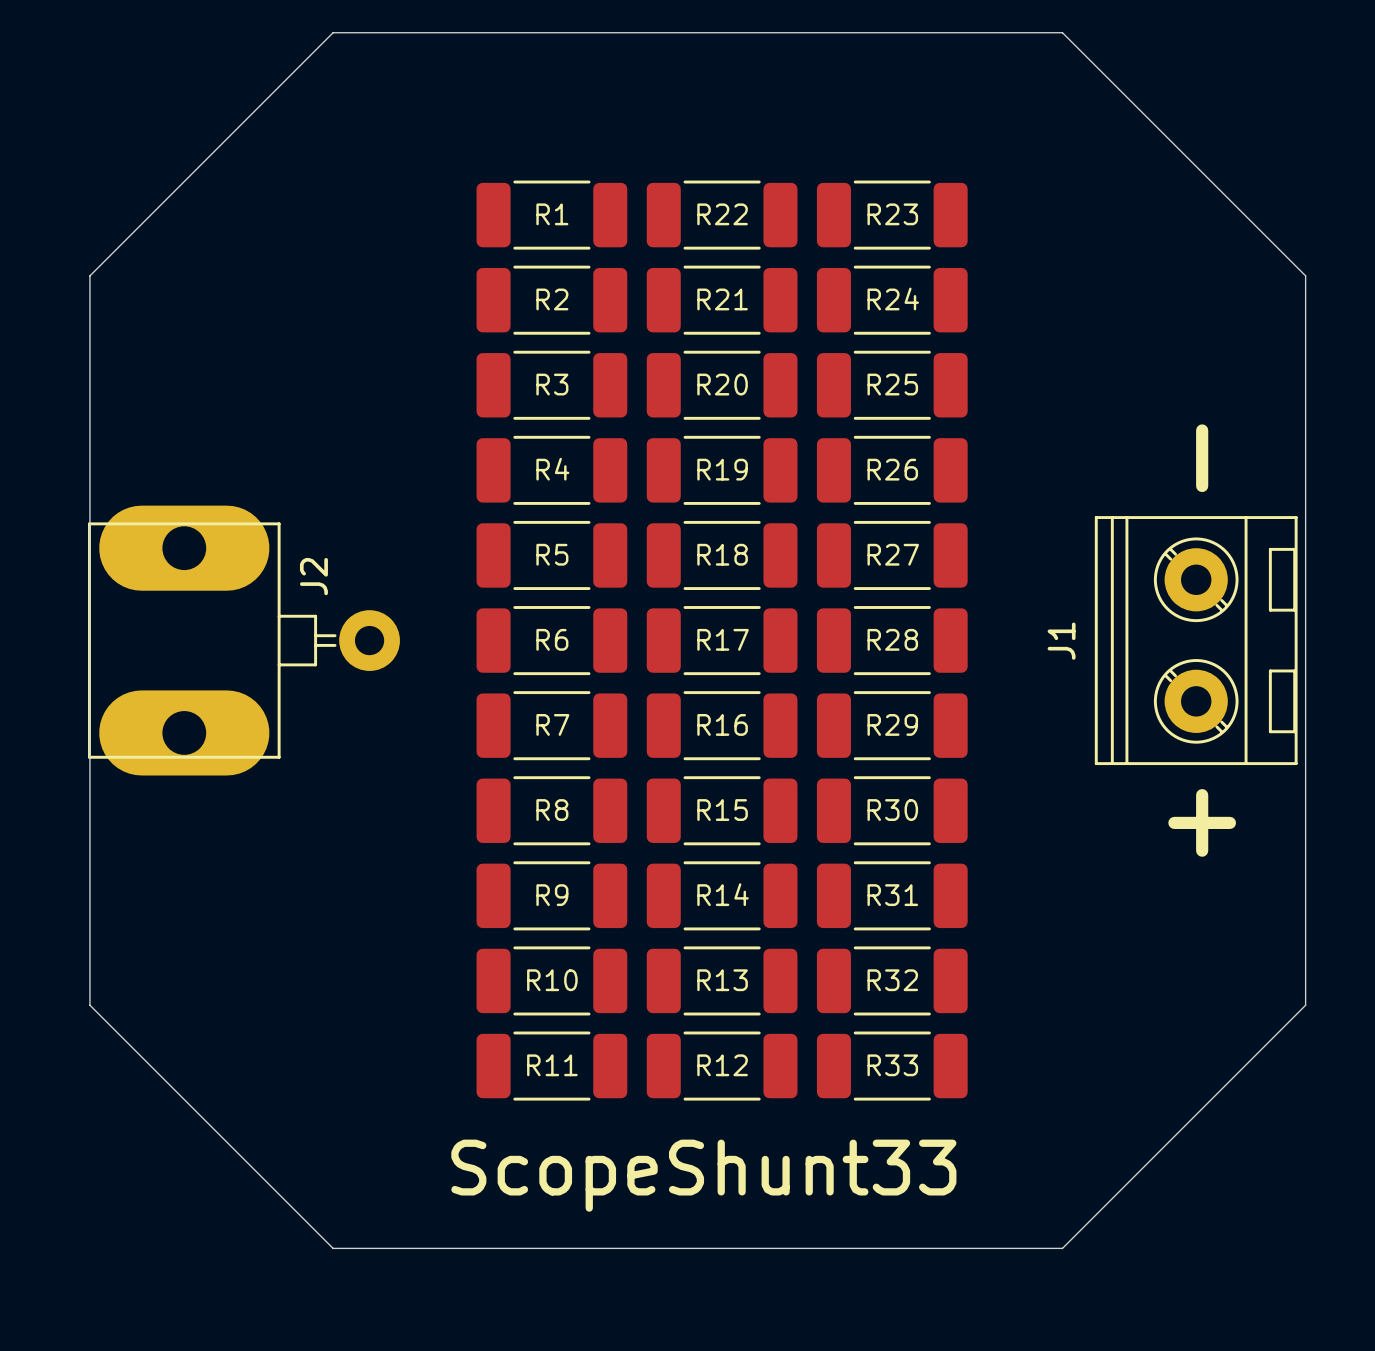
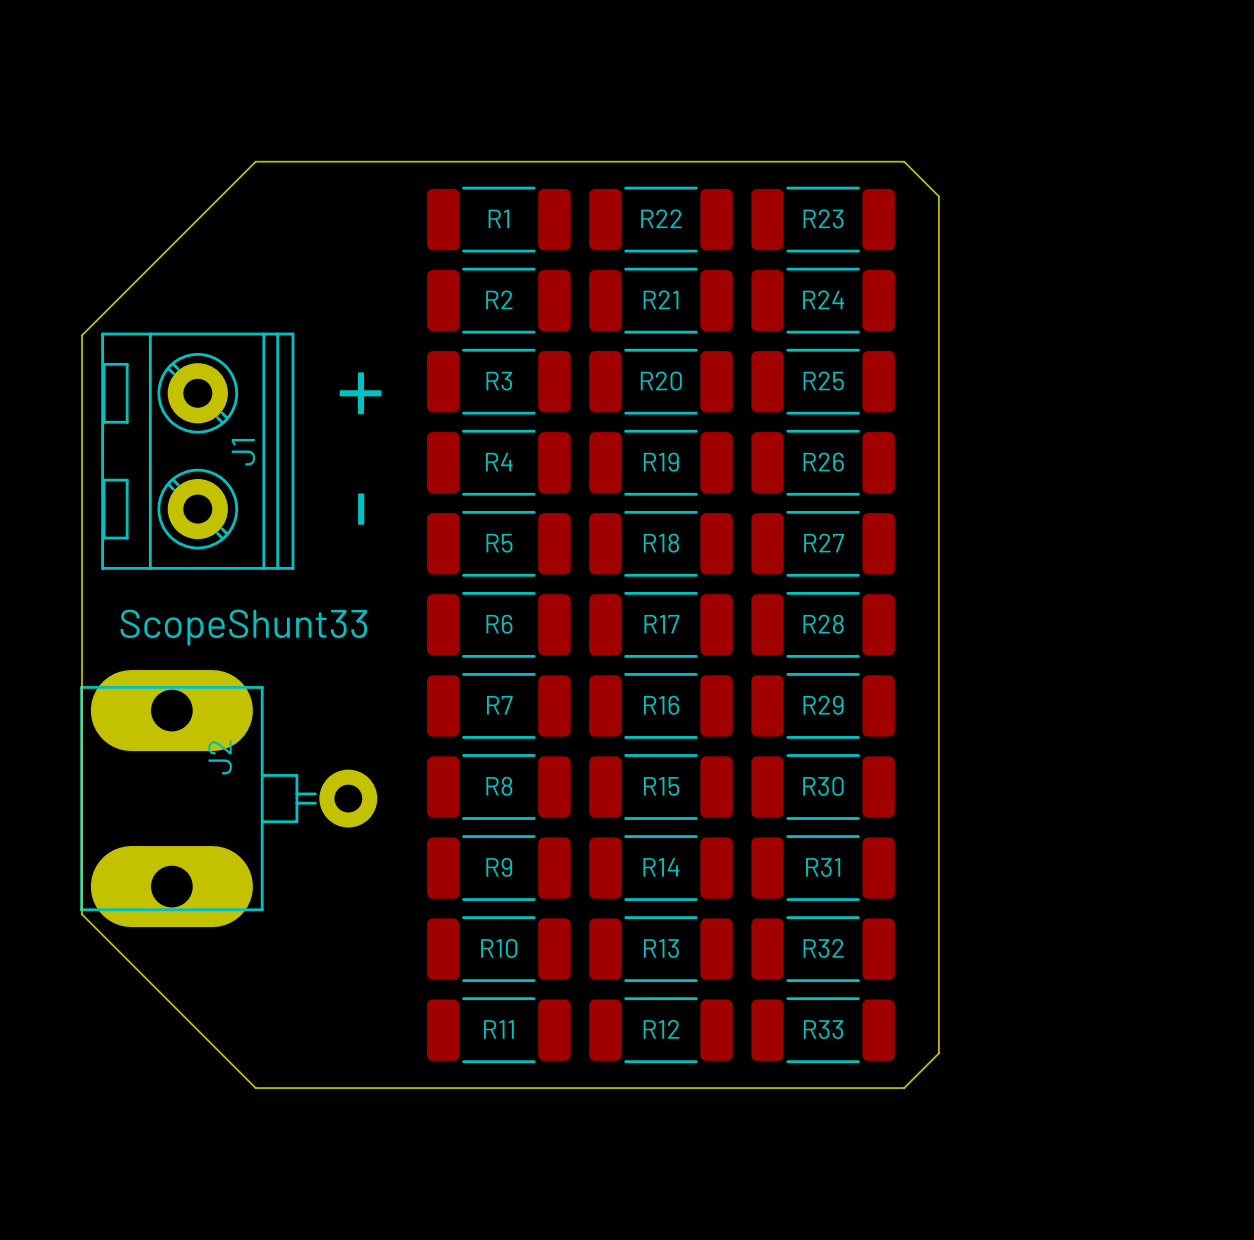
board edge: (333, 32) (89, 275) (89, 1005) (333, 1248) (1062, 1248) (1305, 1005) (1305, 275) (1062, 32) (333, 32) -> (255, 161) (82, 335) (82, 914) (255, 1088) (904, 1088) (938, 1053) (938, 196) (904, 161) (255, 161)
text: none -> + (360, 393)
text: - (1202, 458) -> none
text: none -> - (361, 509)
J2 name position: J2 (313, 576) -> J2 (220, 757)
J2 position: (243, 640) -> (228, 798)
J1 rotation: 0° (1196, 640) -> 180° (197, 451)
J1 position: (1196, 640) -> (197, 451)
J1 name position: J1 (1061, 641) -> J1 (243, 452)
text: none -> ScopeShunt33 (243, 627)
text: + (1202, 822) -> none
text: ScopeShunt33 (703, 1175) -> none

